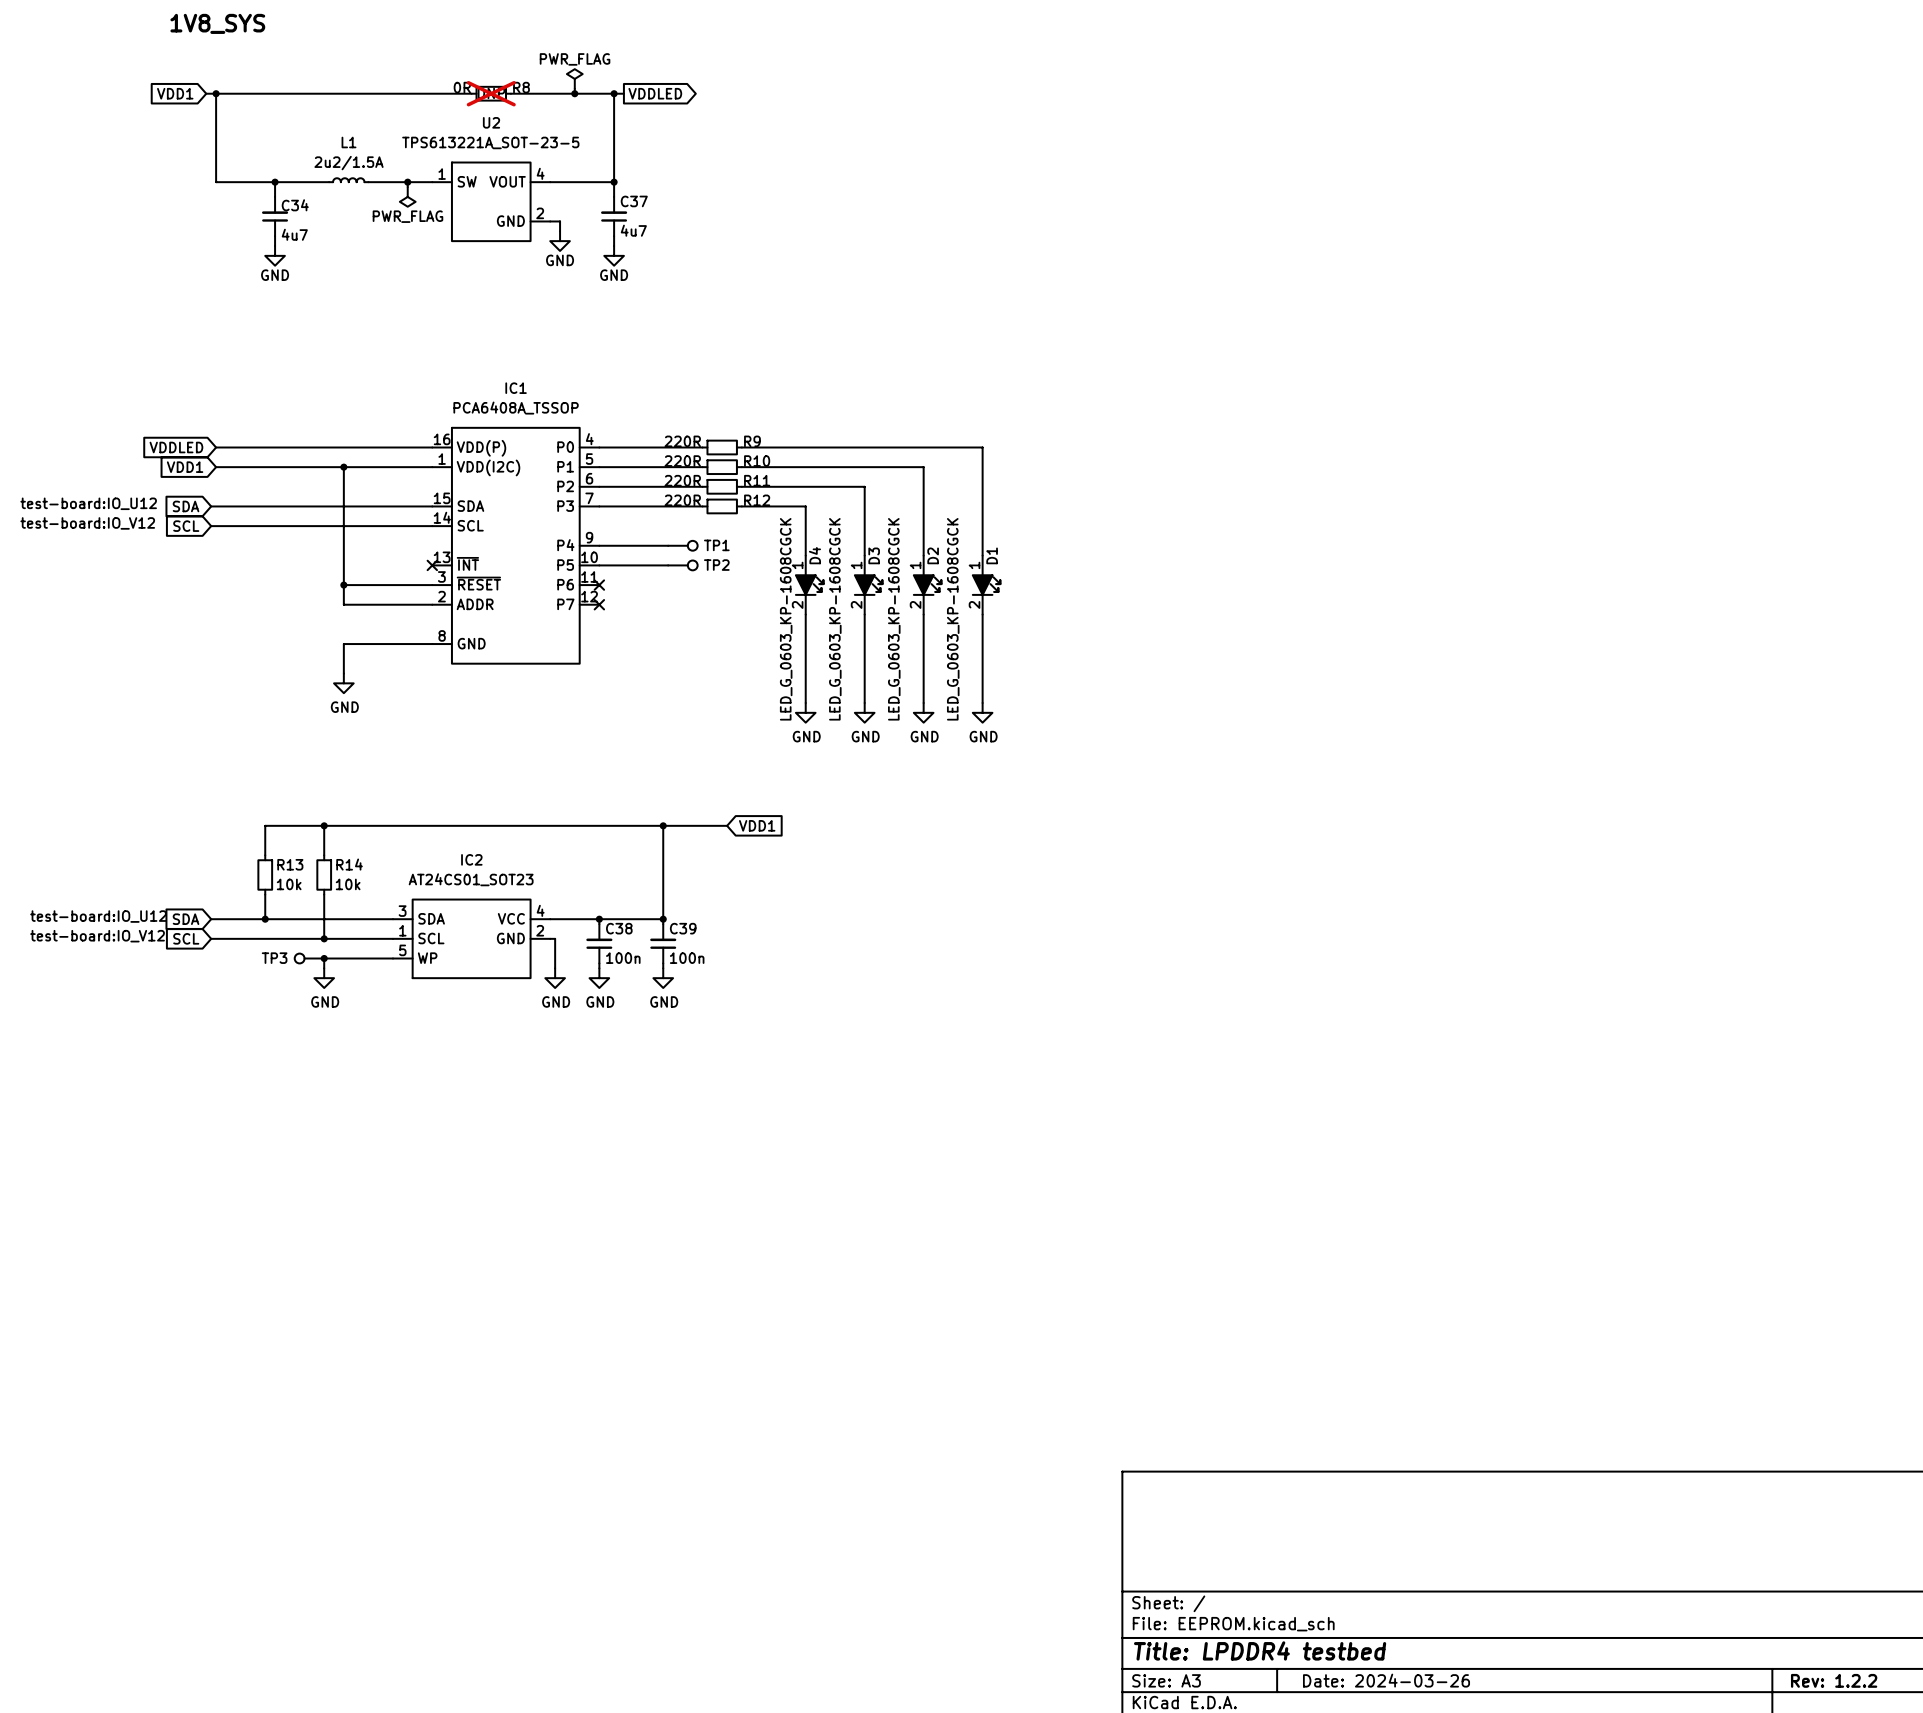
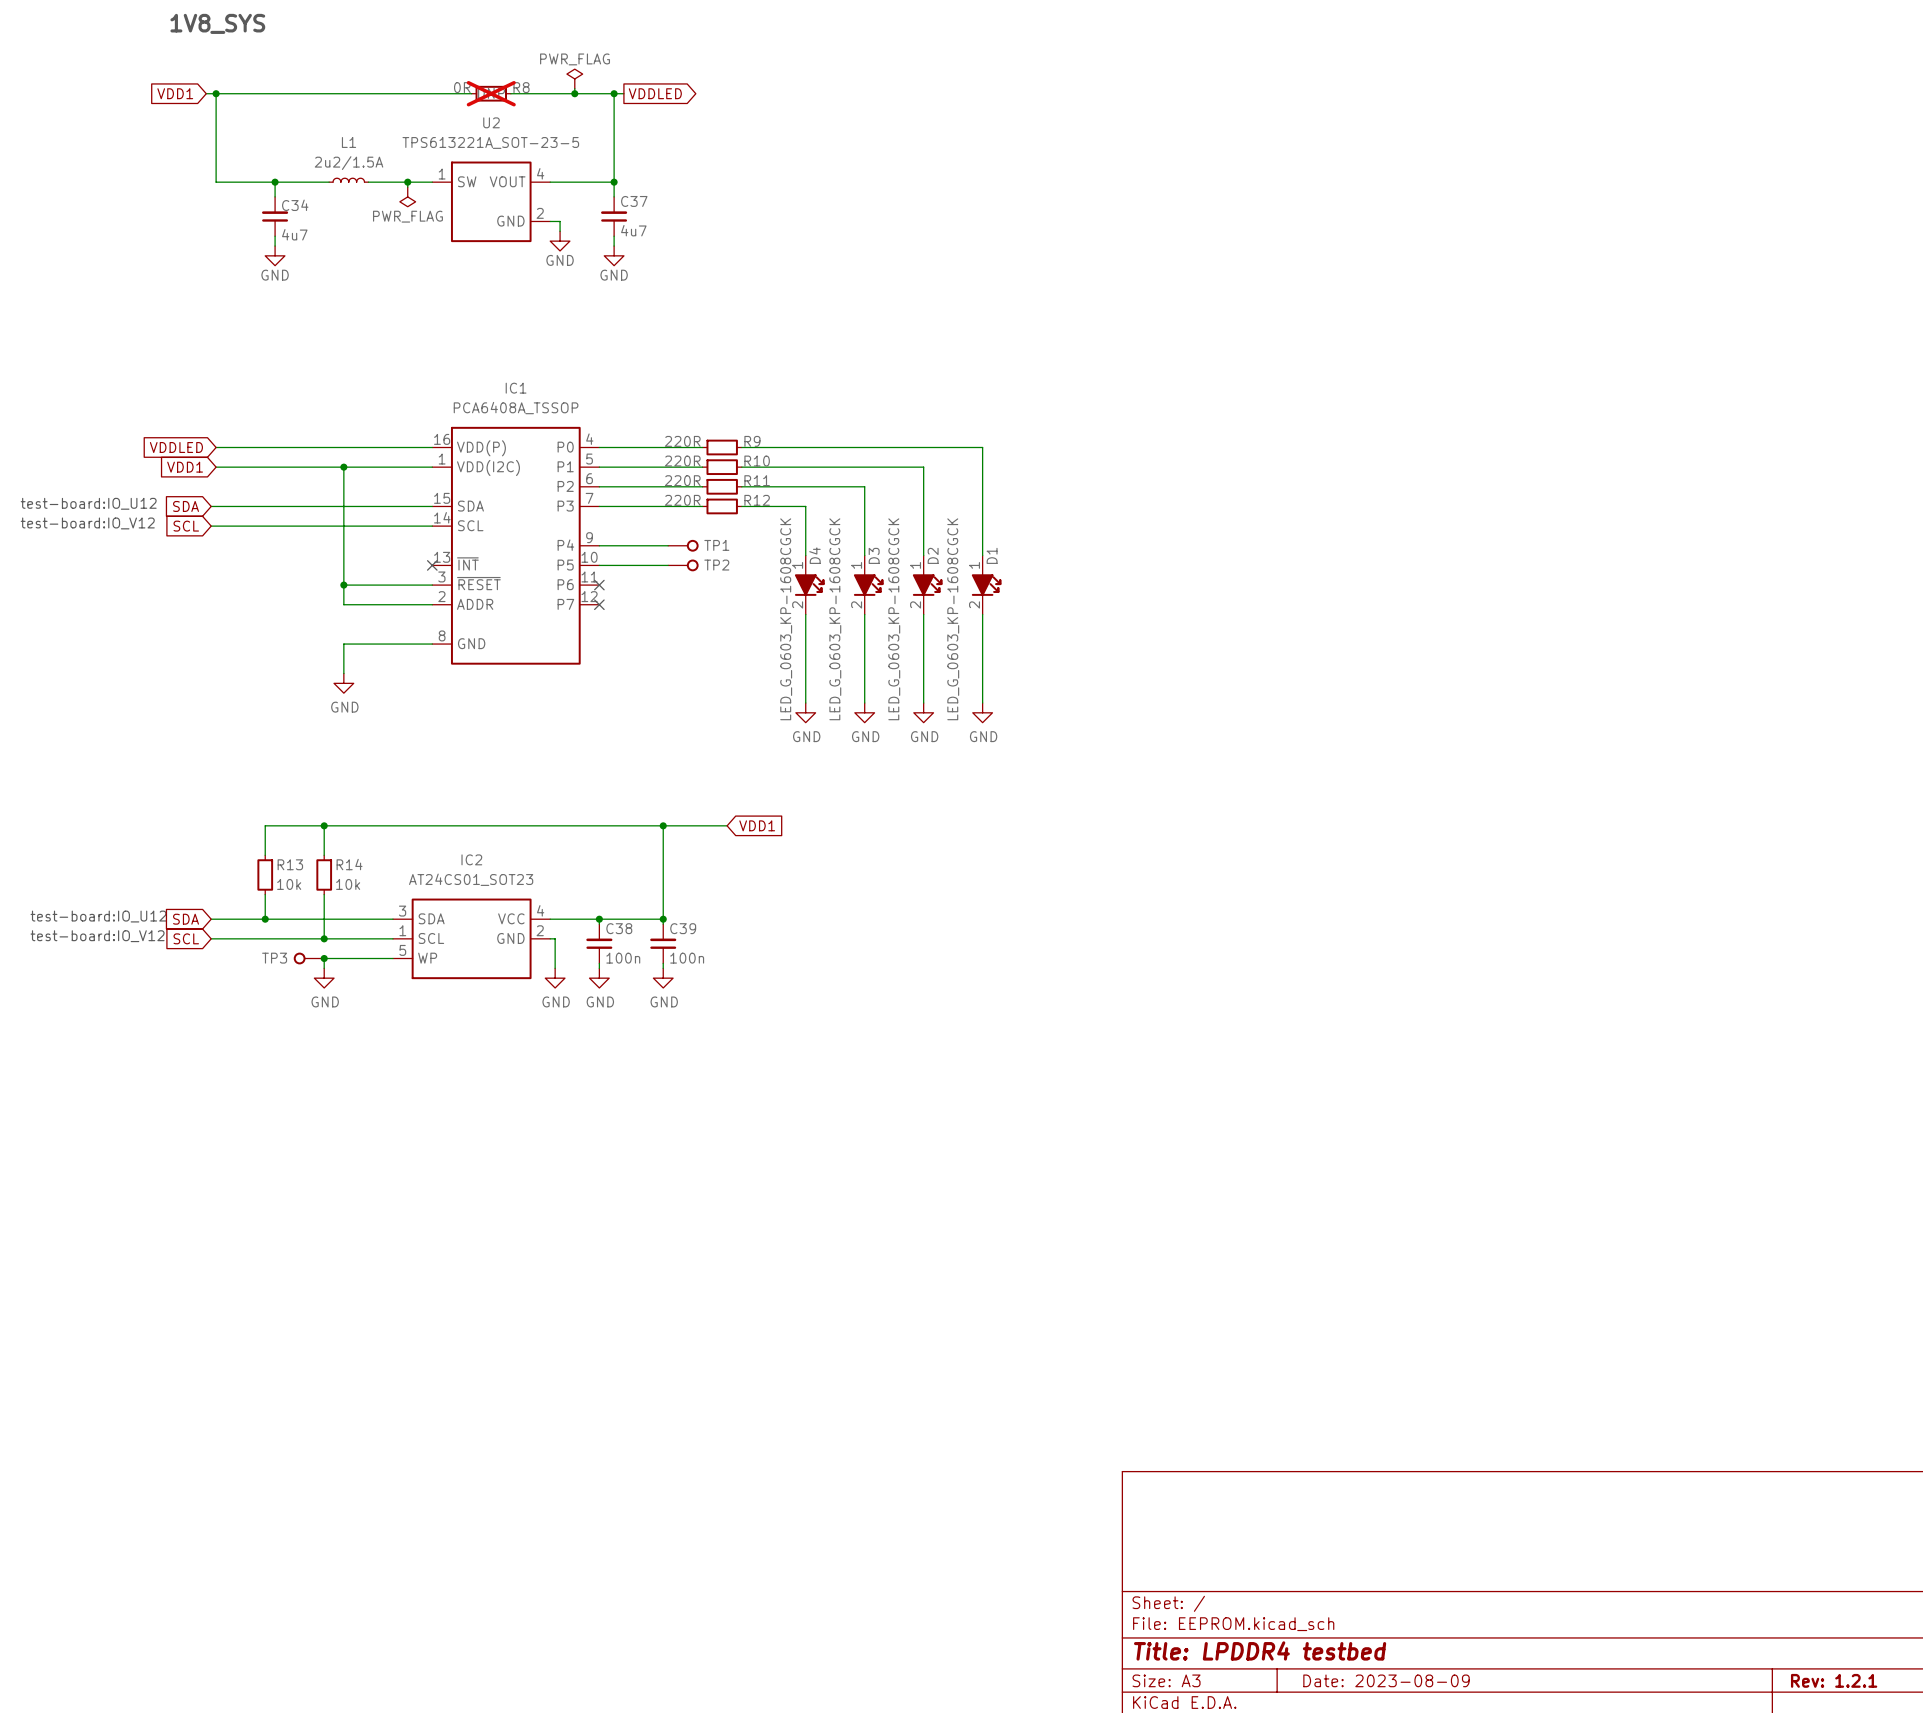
title block: Date: 2024-03-26 (1386, 1680) -> Date: 2023-08-09 (1386, 1680)
title block: Rev: 1.2.2 (1834, 1680) -> Rev: 1.2.1 (1834, 1680)

